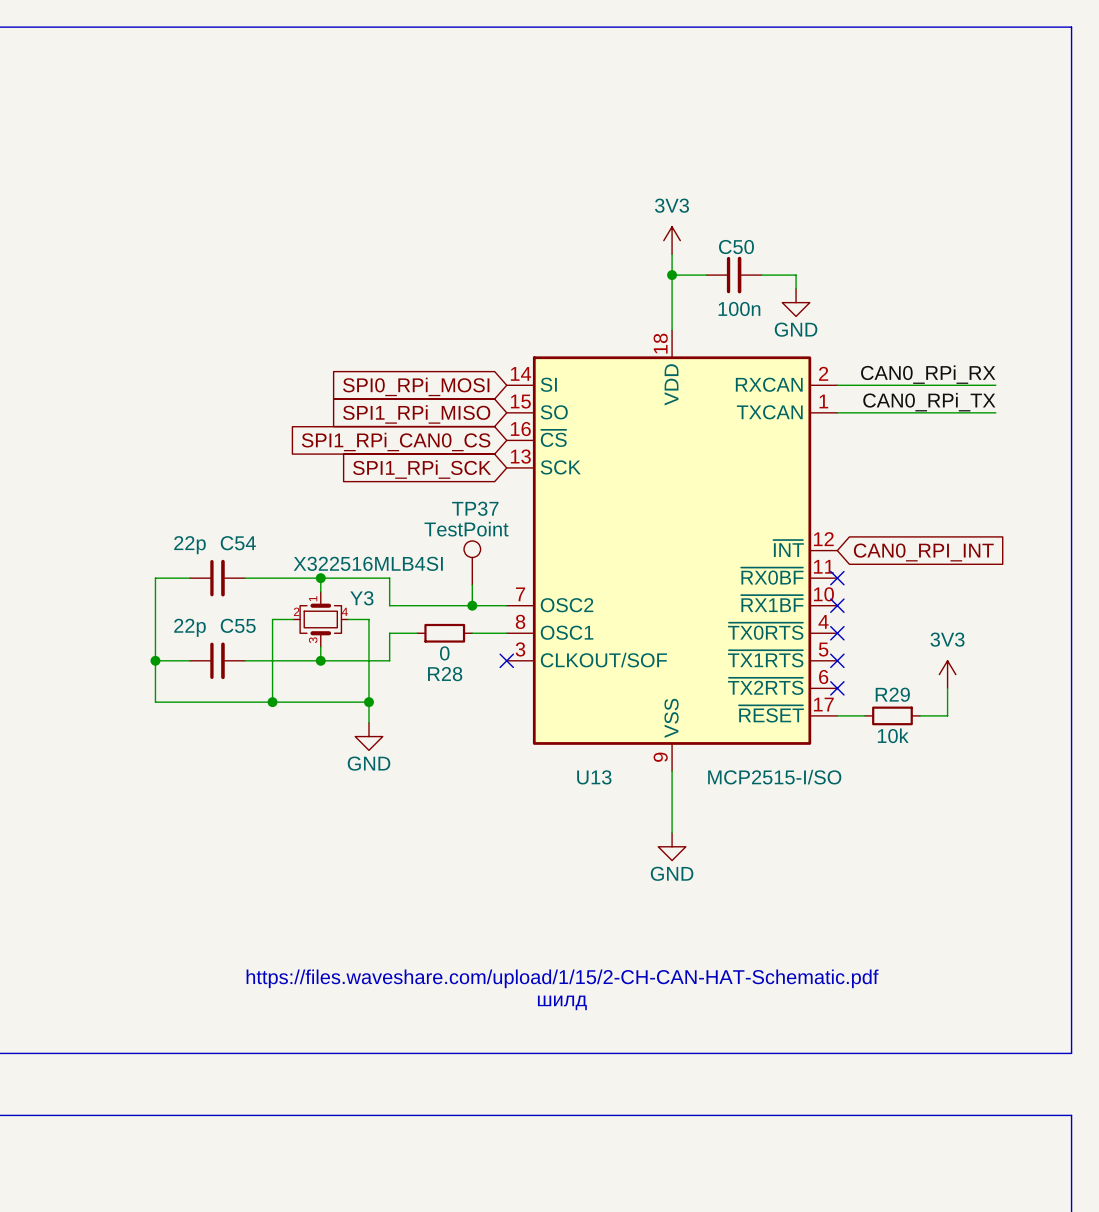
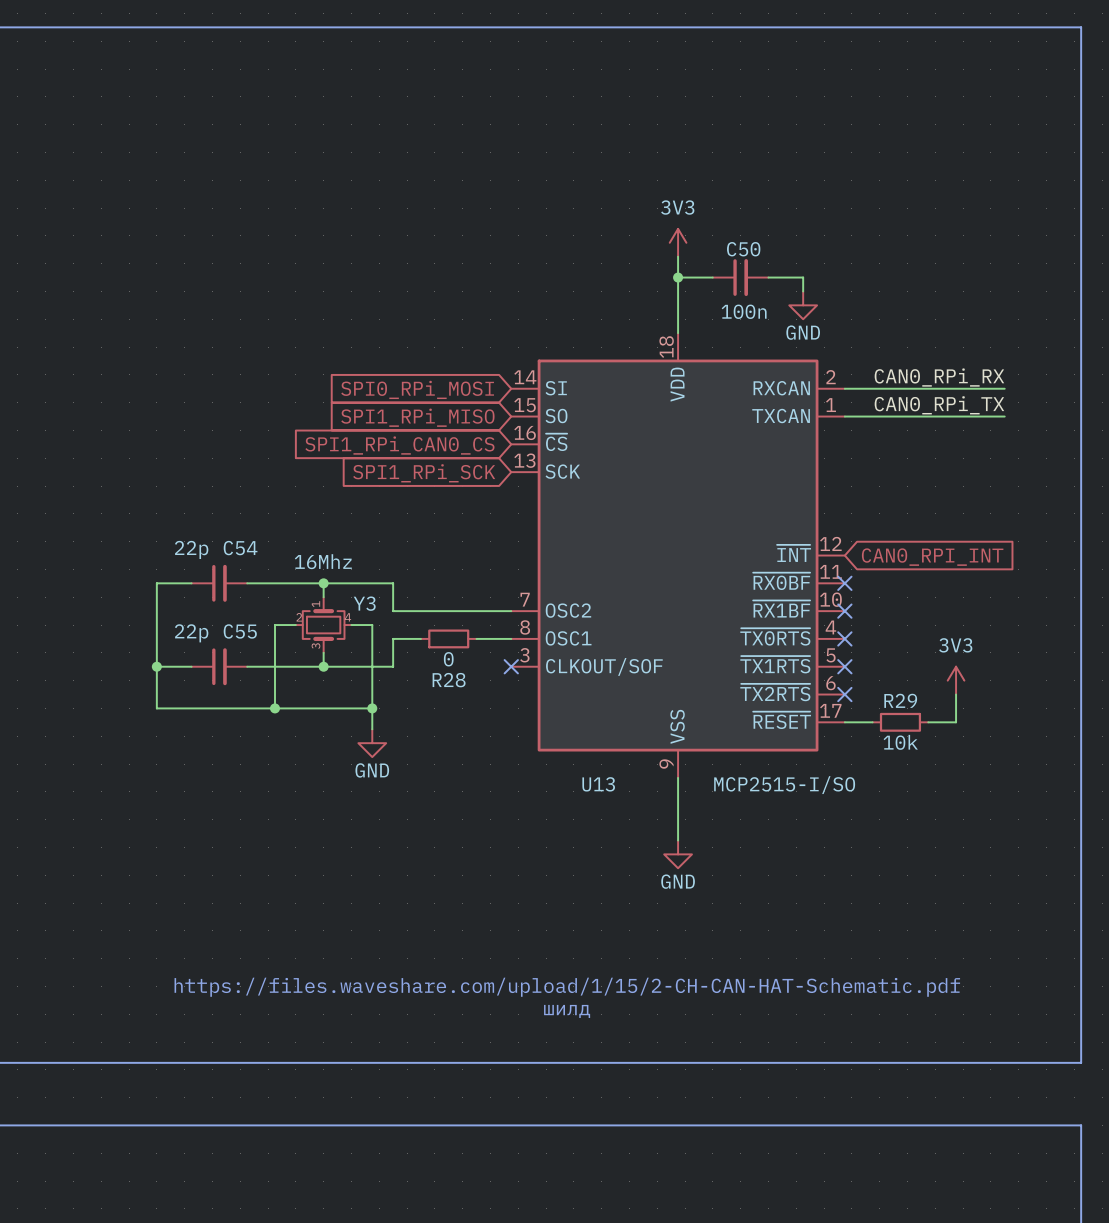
Y3 value: X322516MLB4SI (368, 563) -> 16Mhz (323, 561)
TP37: TestPoint (472, 563) -> none
wire: (472, 585) (472, 605) -> none
junction: (472, 605) -> none

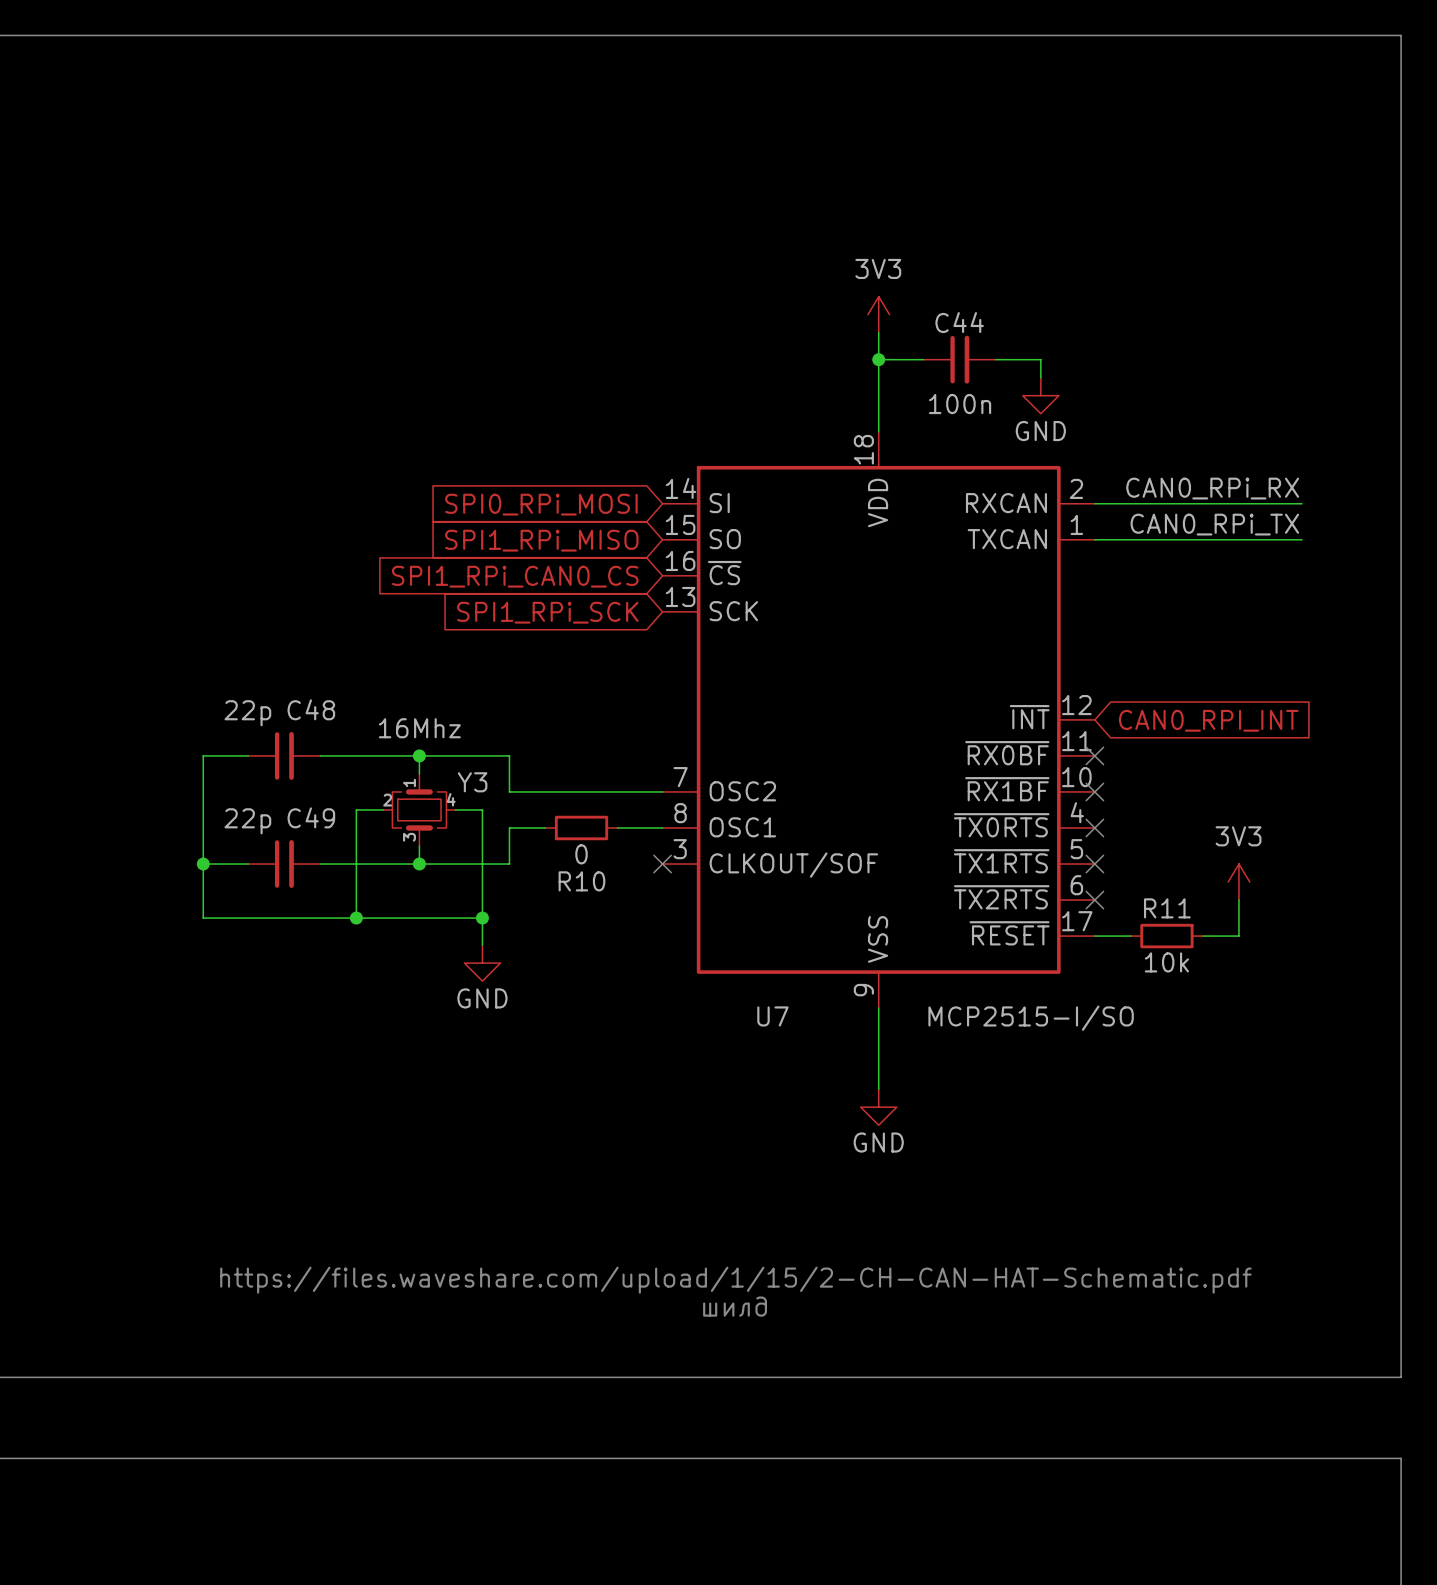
C50 name: C50 (743, 249) -> C44 (959, 322)
C54 name: C54 (240, 548) -> C48 (311, 709)
C55 name: C55 (240, 631) -> C49 (311, 817)
R28 name: R28 (449, 680) -> R10 (581, 881)
R29 name: R29 (900, 700) -> R11 (1167, 908)
U13 name: U13 (598, 784) -> U7 (772, 1016)

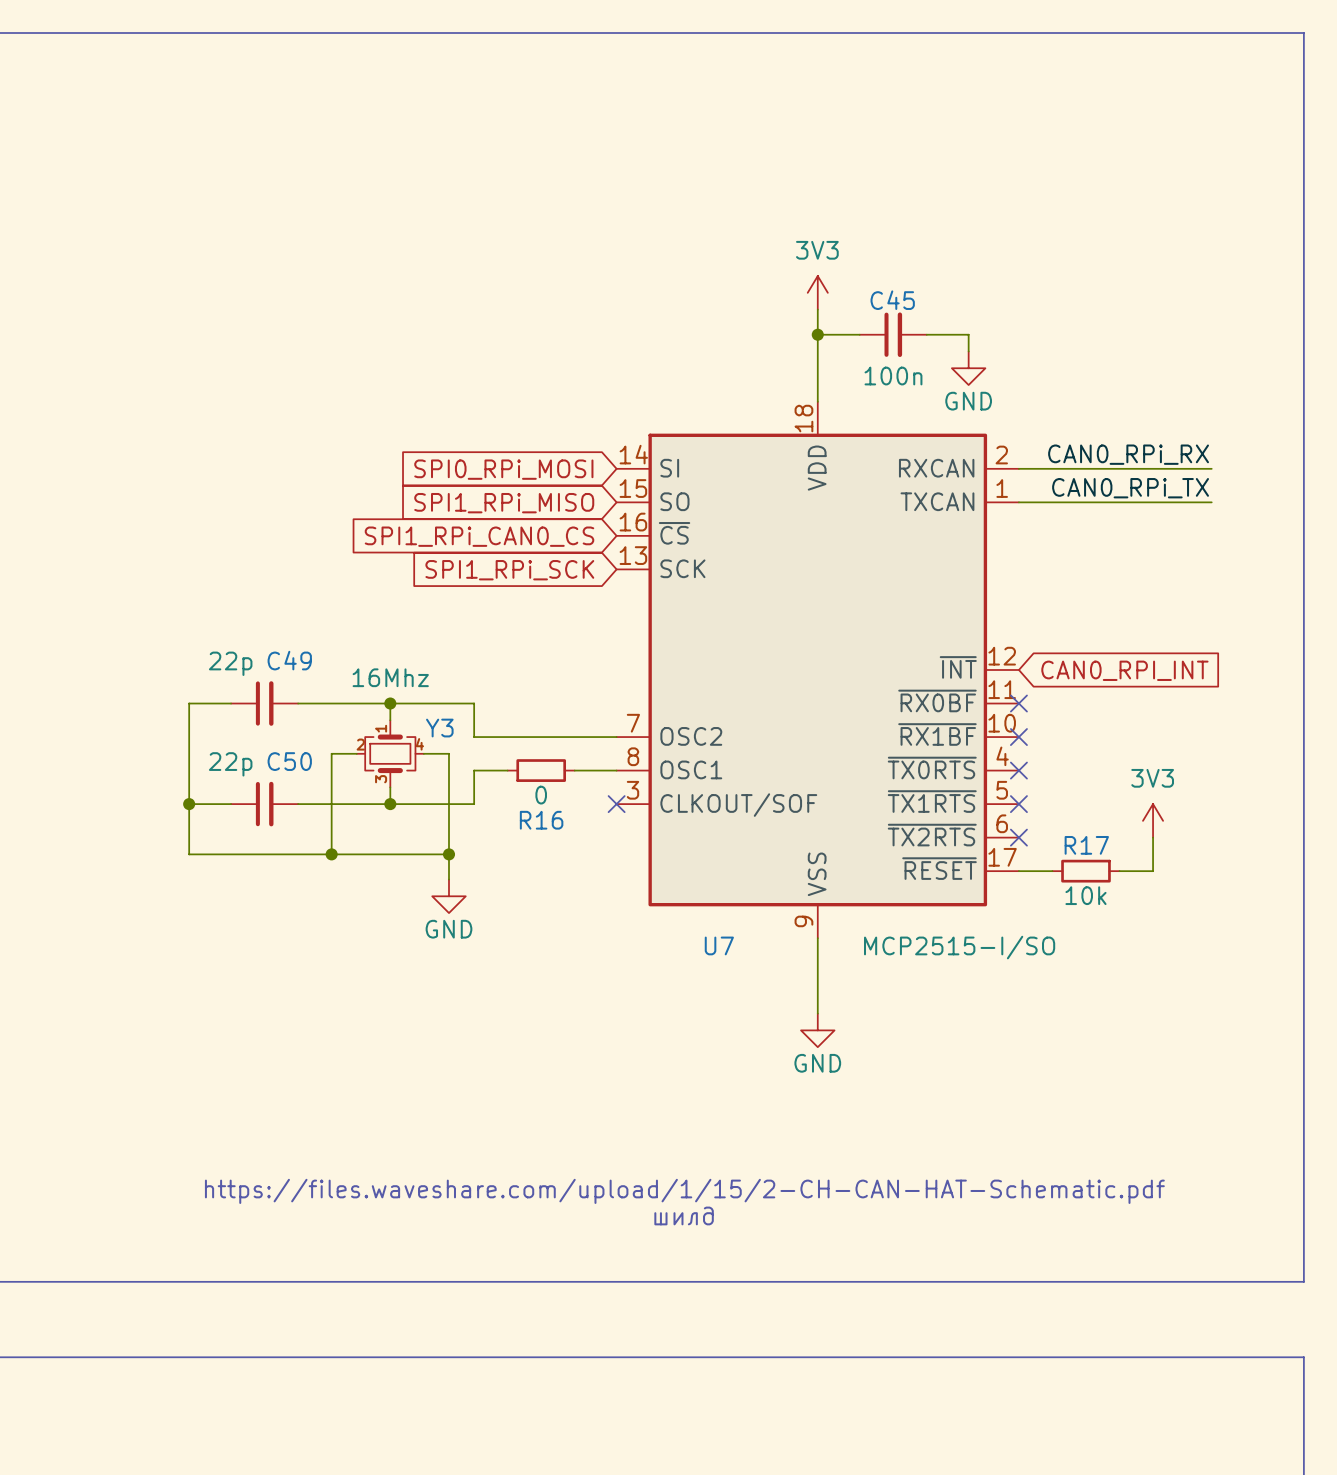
C44 name: C44 (959, 322) -> C45 (892, 300)
C48 name: C48 (311, 709) -> C49 (289, 660)
C49 name: C49 (311, 817) -> C50 (289, 761)
R10 name: R10 (581, 881) -> R16 (541, 820)
R11 name: R11 (1167, 908) -> R17 (1086, 845)

